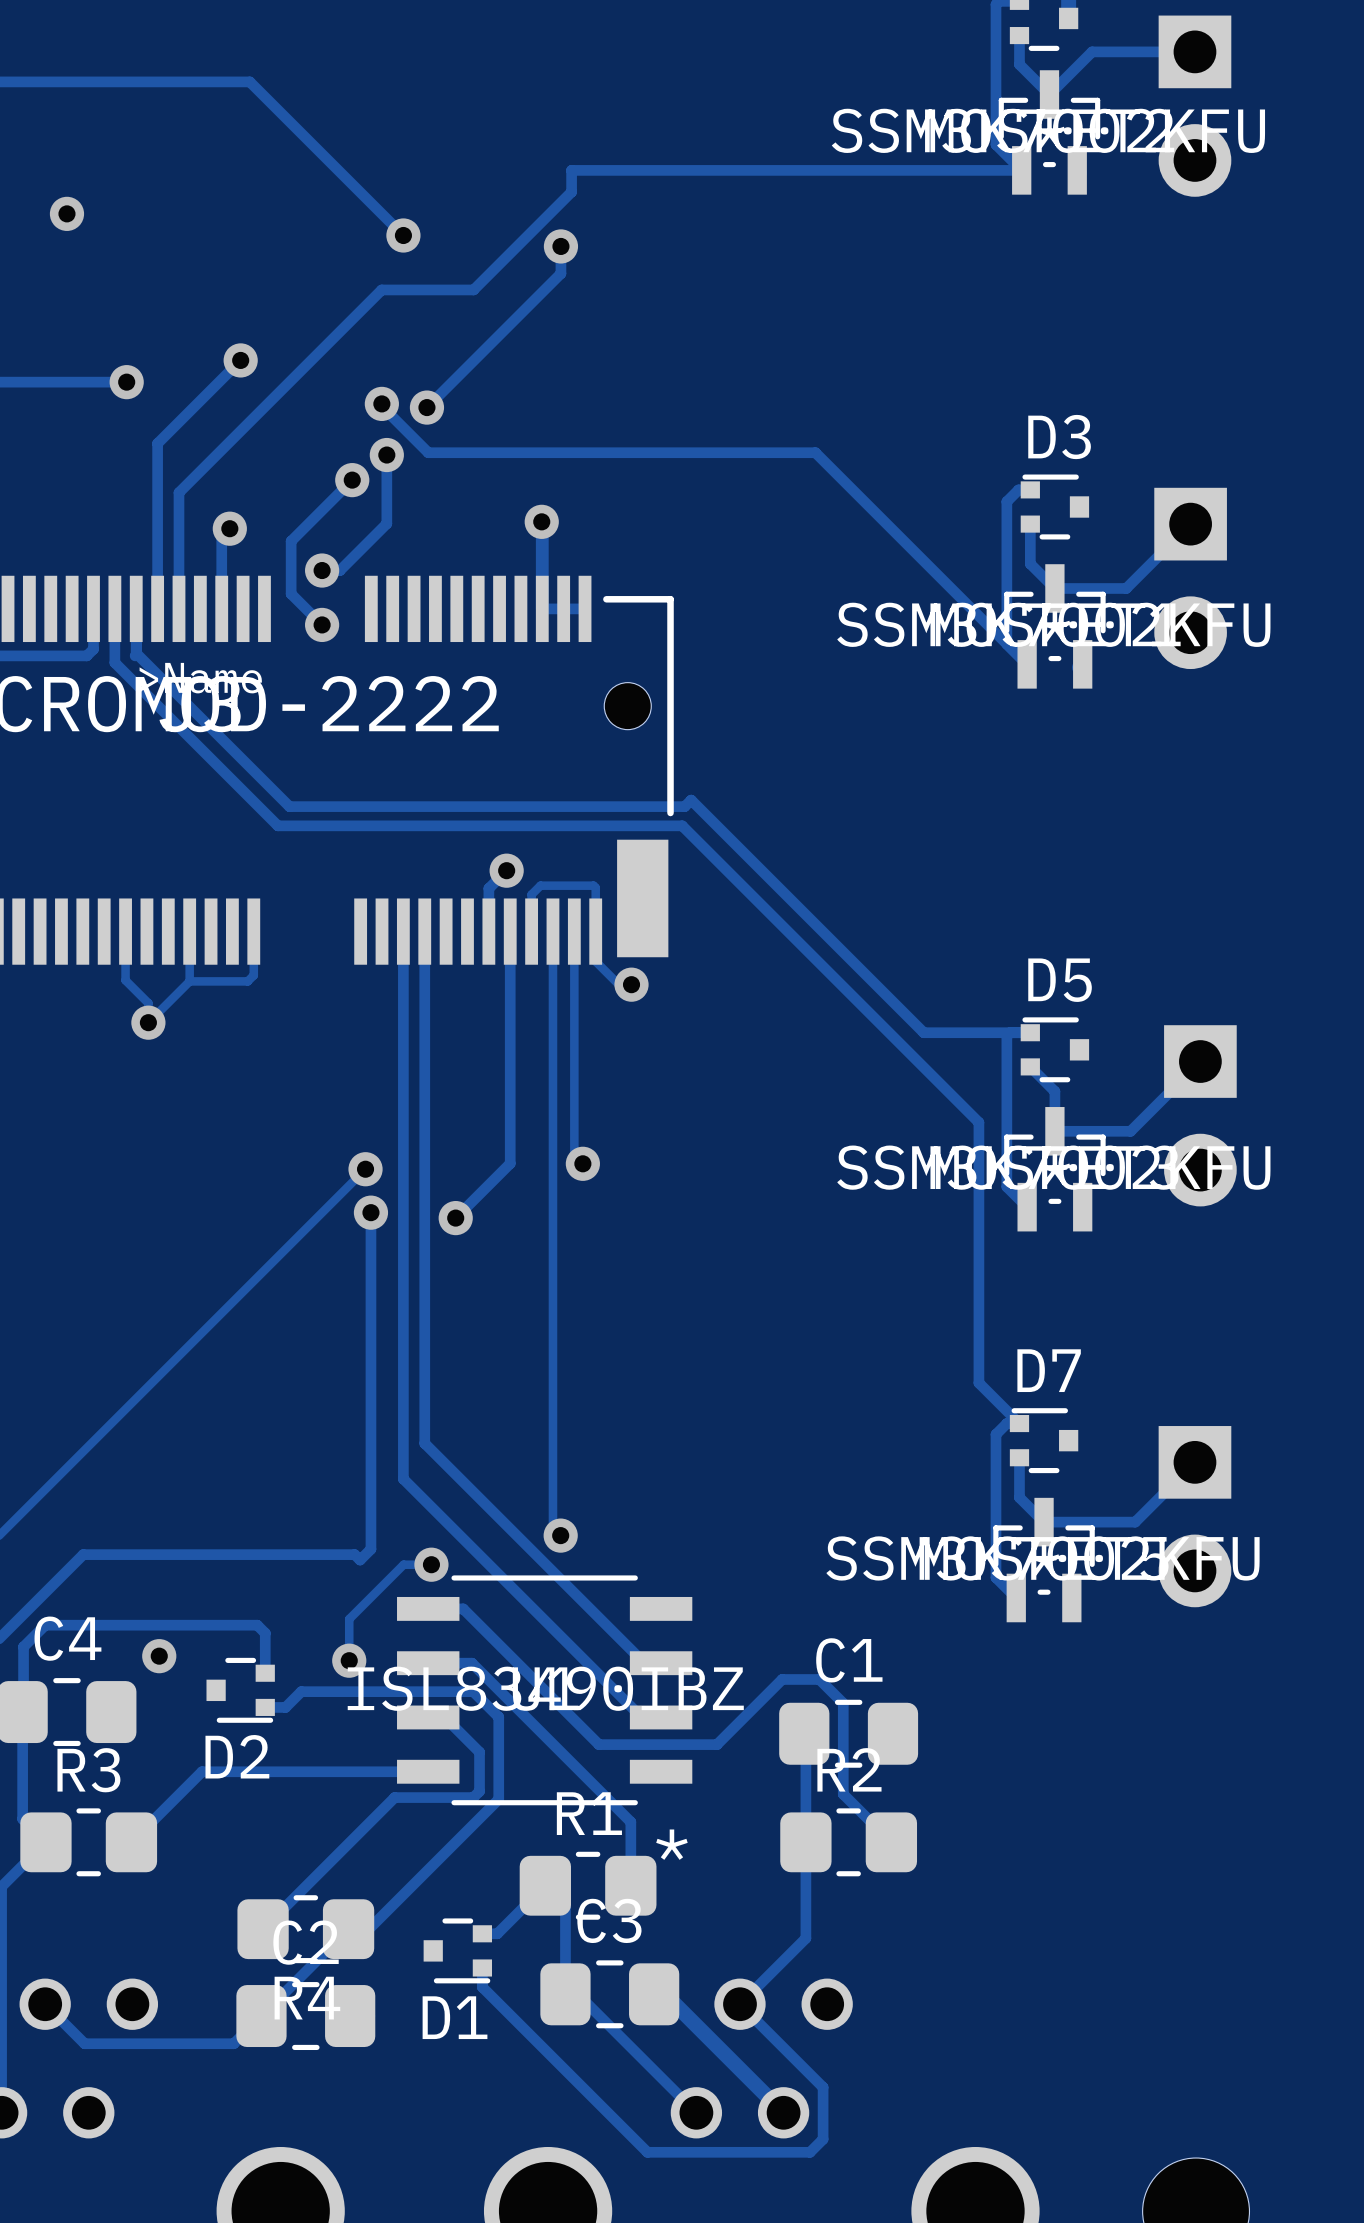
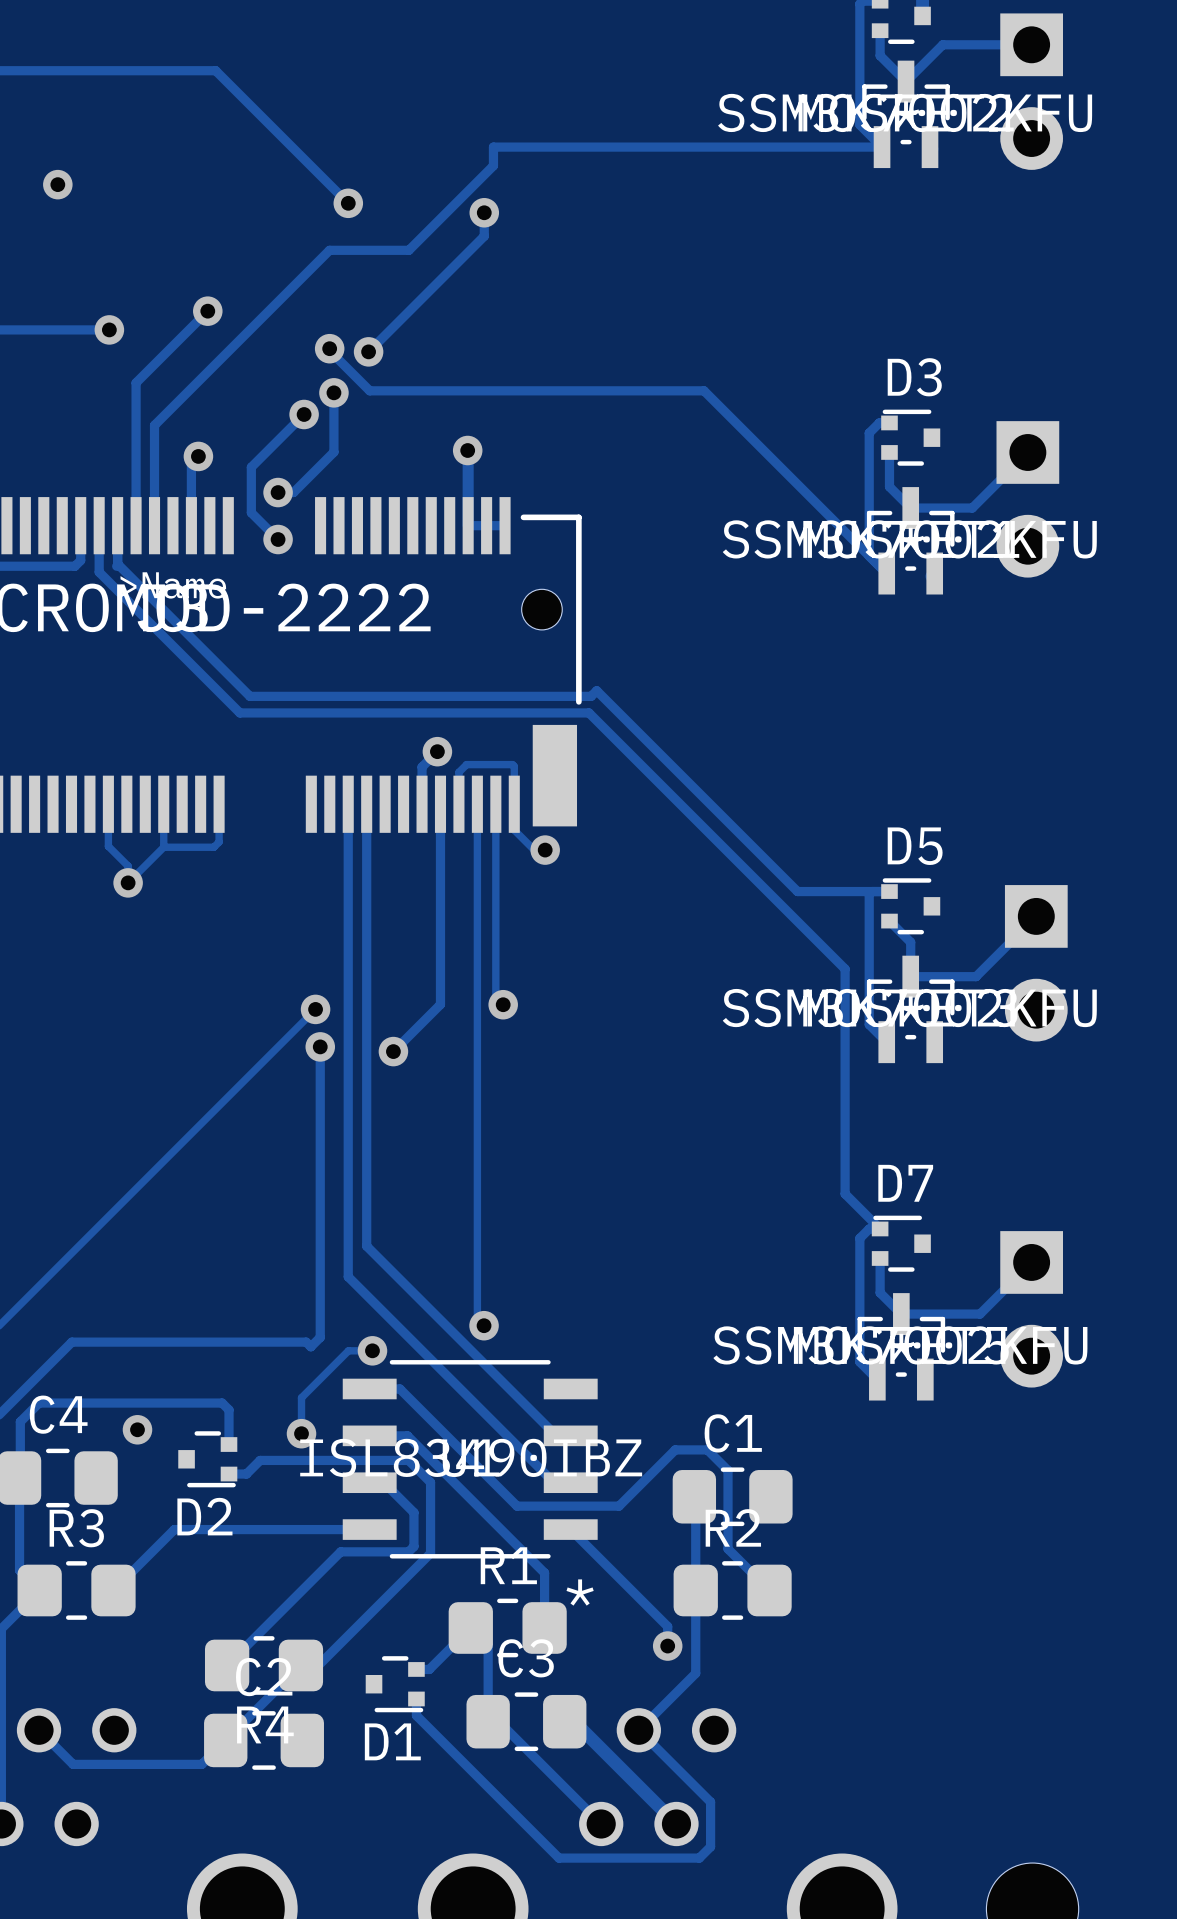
track: none -> (570, 1529) (667, 1626) (667, 1646)
via: none -> (667, 1646)

